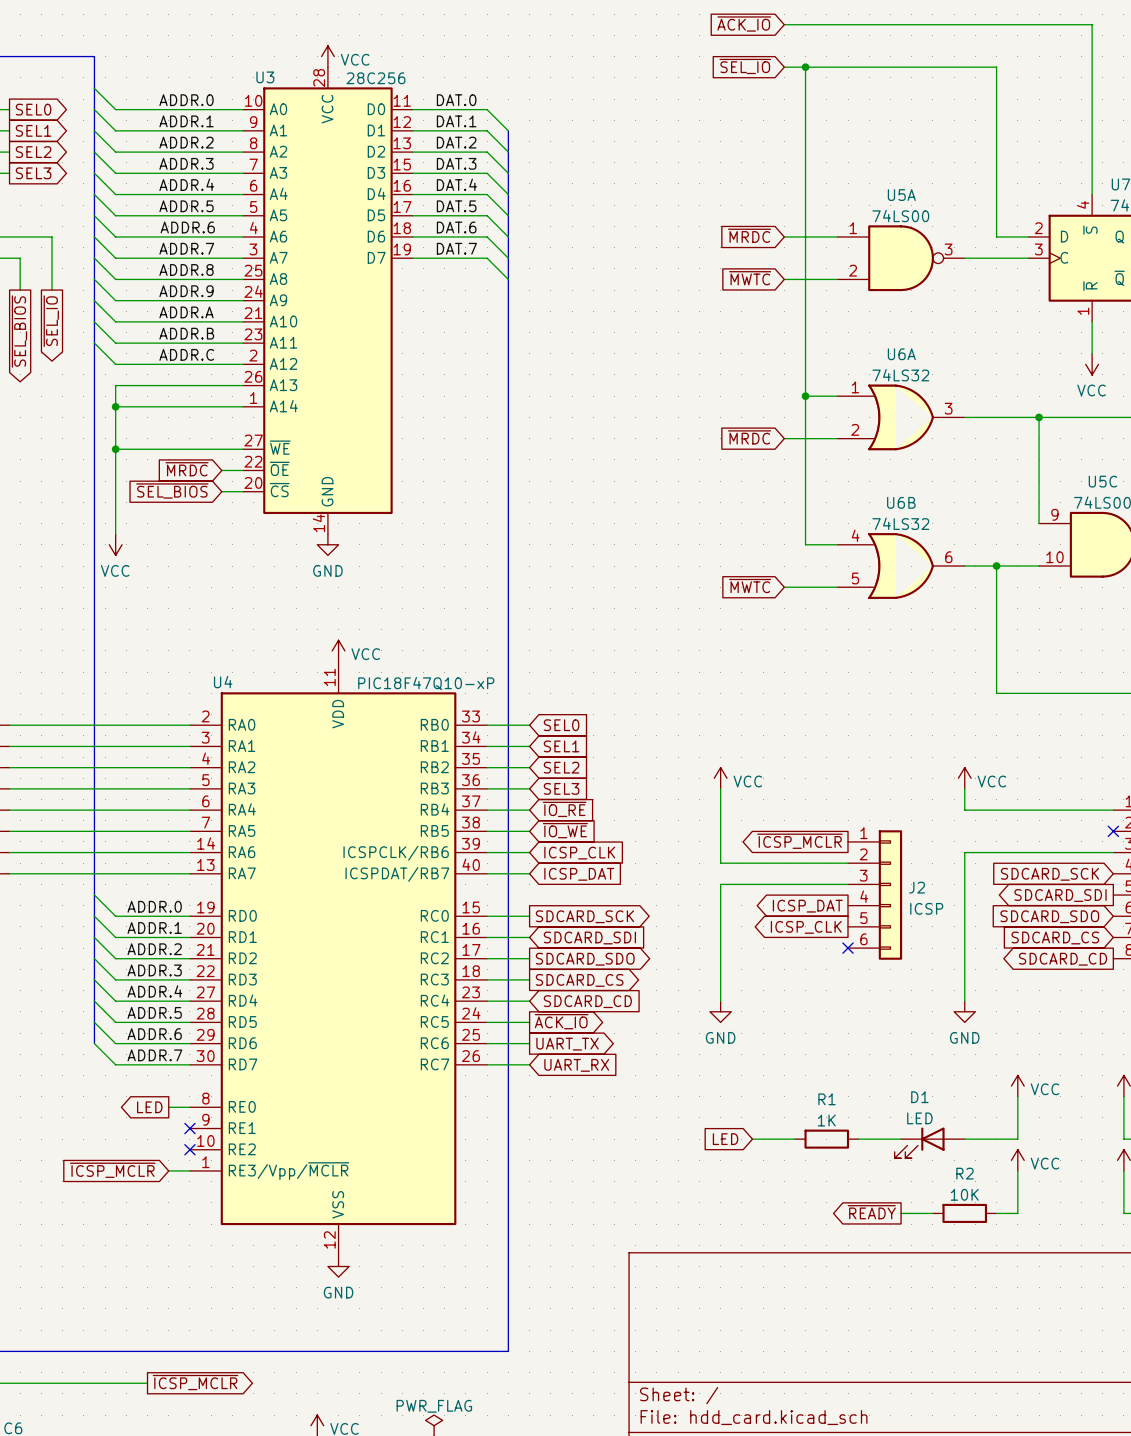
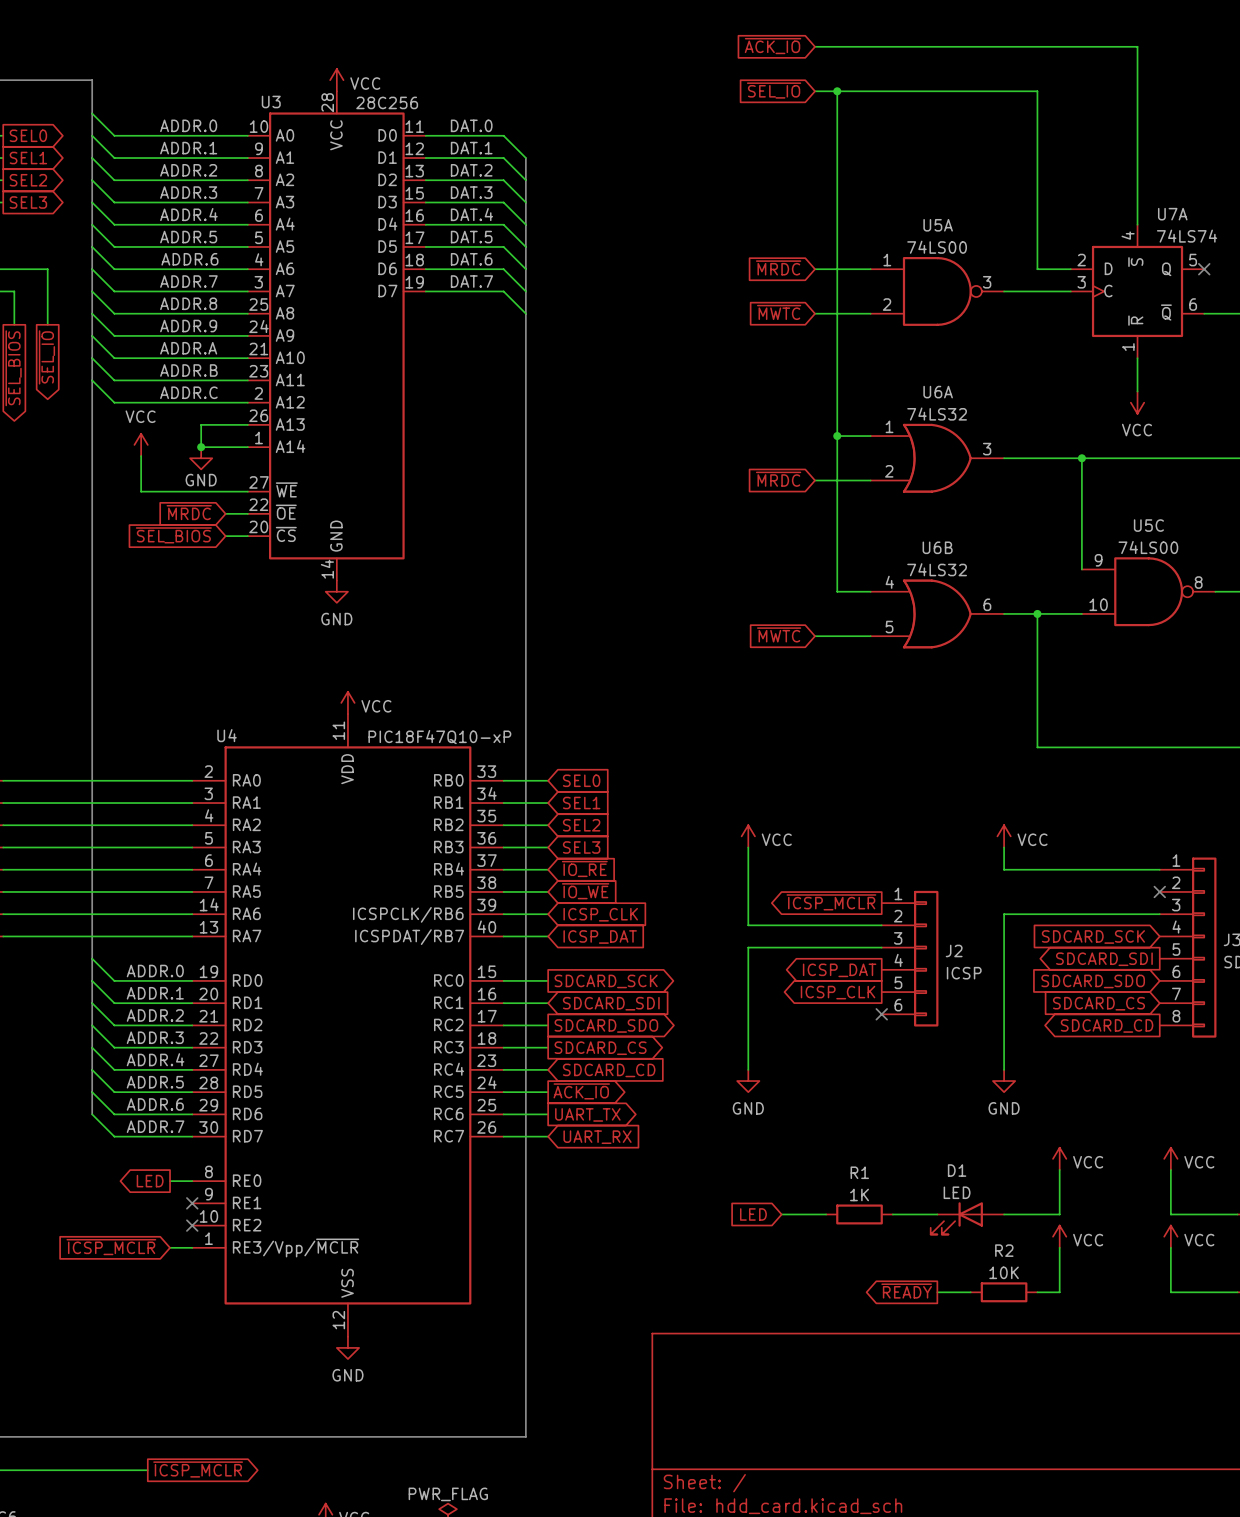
wire: (198, 385) (115, 385) (115, 534) -> none
wire: (115, 406) (198, 406) -> (201, 424) (201, 447)
junction: (115, 406) -> none
junction: none -> (201, 447)
power symbol: none -> GND (201, 458)
wire: (115, 449) (141, 449) -> (141, 456) (141, 491)
junction: (115, 449) -> none
power symbol rotation: 0° (115, 544) -> 180° (141, 444)
power symbol position: VCC (115, 544) -> VCC (141, 444)

